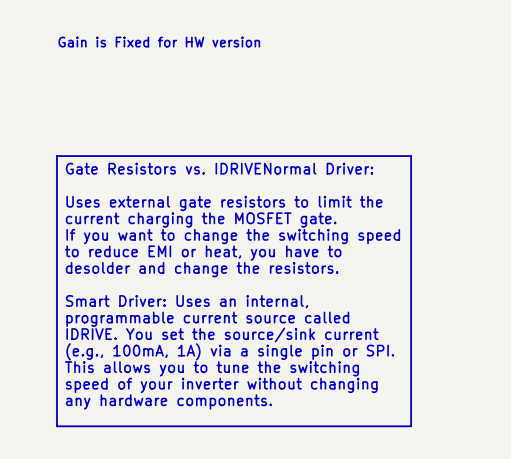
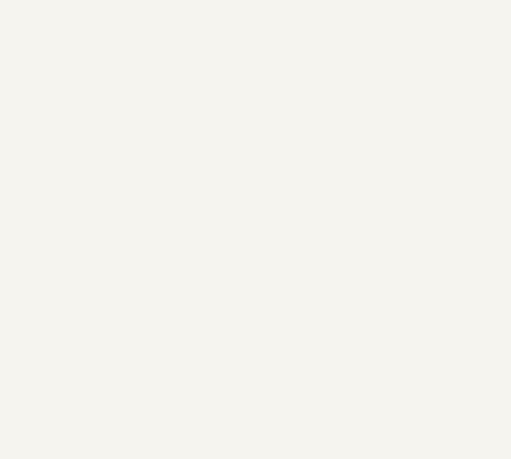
text: Gain is Fixed for HW version (159, 42) -> none
line: (56, 156) (411, 156) (411, 426) (56, 426) (56, 156) -> none
text: Gate Resistors vs. IDRIVENormal Driver: (219, 168) -> none
text: Uses external gate resistors to limit the (224, 203) -> none
text: current charging the MOSFET gate. (201, 220) -> none
text: If you want to change the switching speed (233, 236) -> none
text: to reduce EMI or heat, you have to (203, 253) -> none
text: desolder and change the resistors. (202, 269) -> none
text: Smart Driver: Uses an internal, (187, 301) -> none
text: programmable current source called (207, 319) -> none
text: IDRIVE. You set the source/sink current (222, 335) -> none
text: (e.g., 100mA, 1A) via a single pin or SPI. (230, 351) -> none
text: This allows you to tune the switching (211, 368) -> none
text: speed of your inverter without changing (221, 385) -> none
text: any hardware components. (168, 401) -> none

